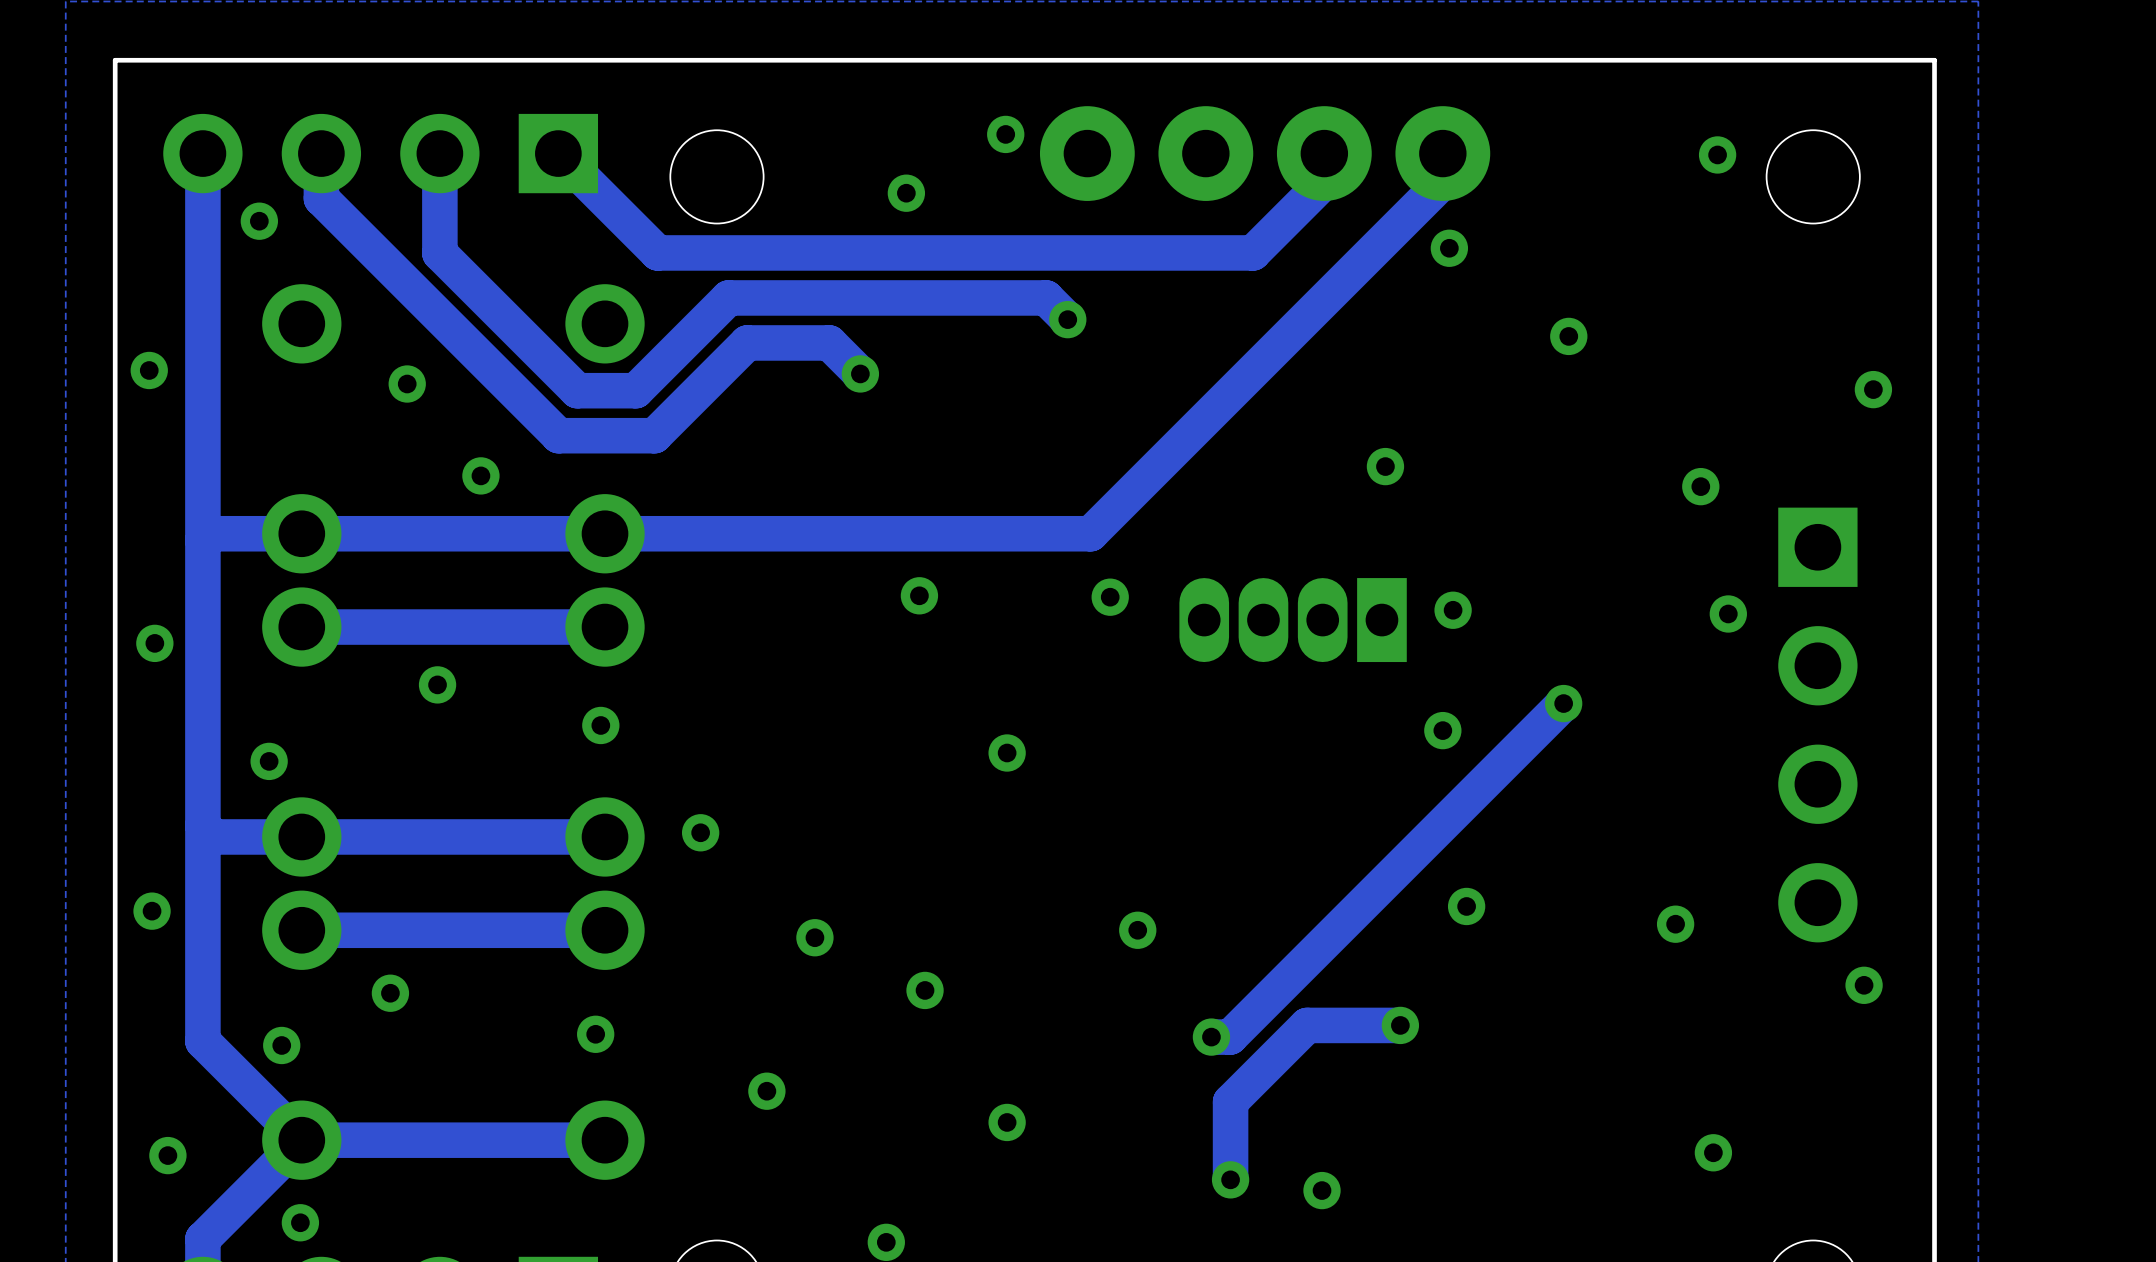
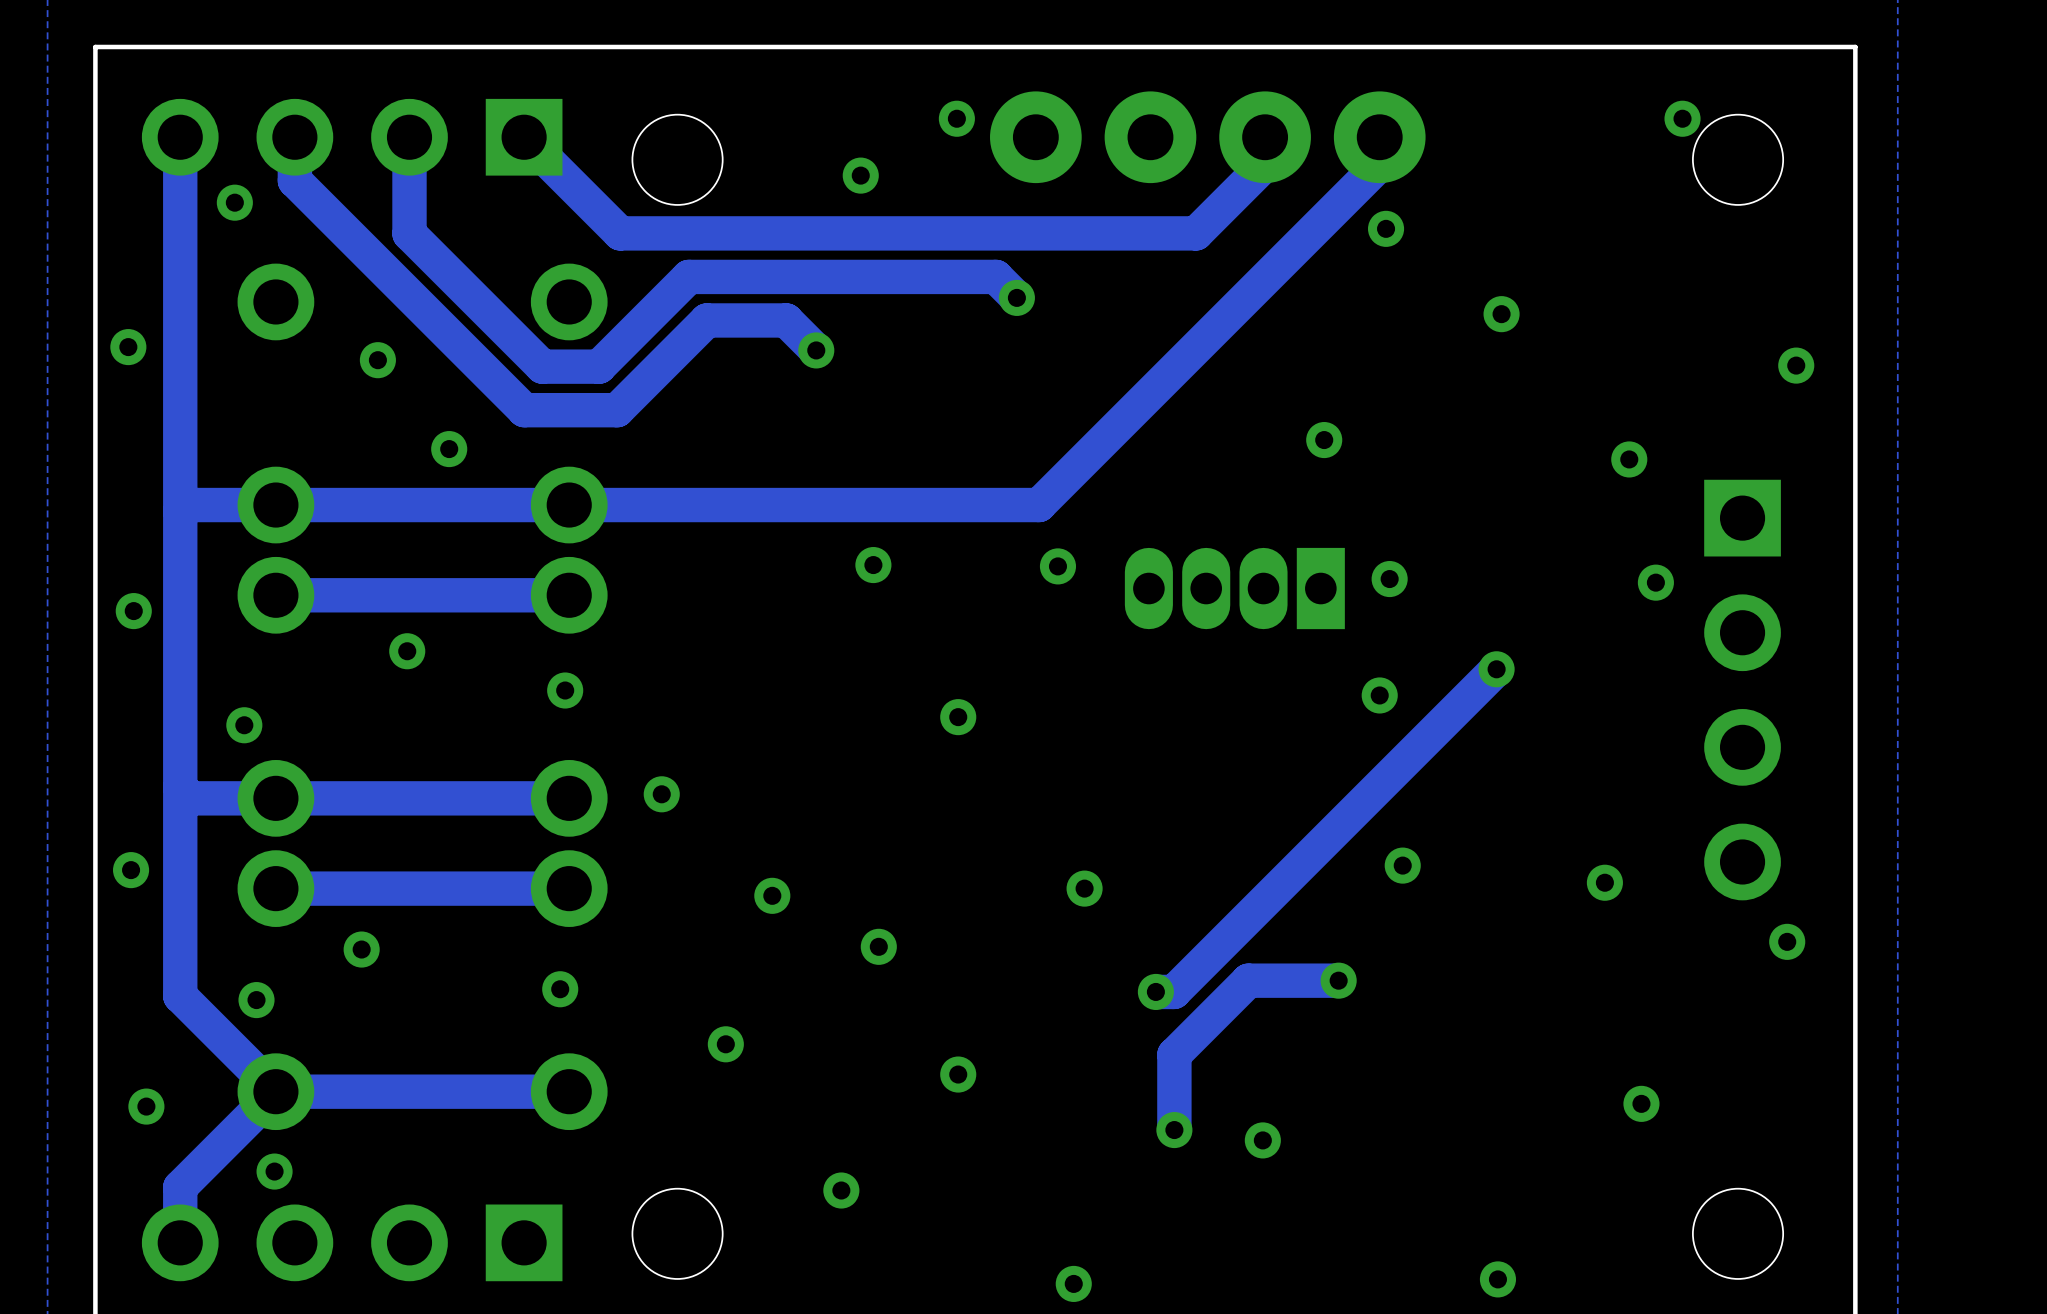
via position: (1717, 154) -> (1682, 118)

